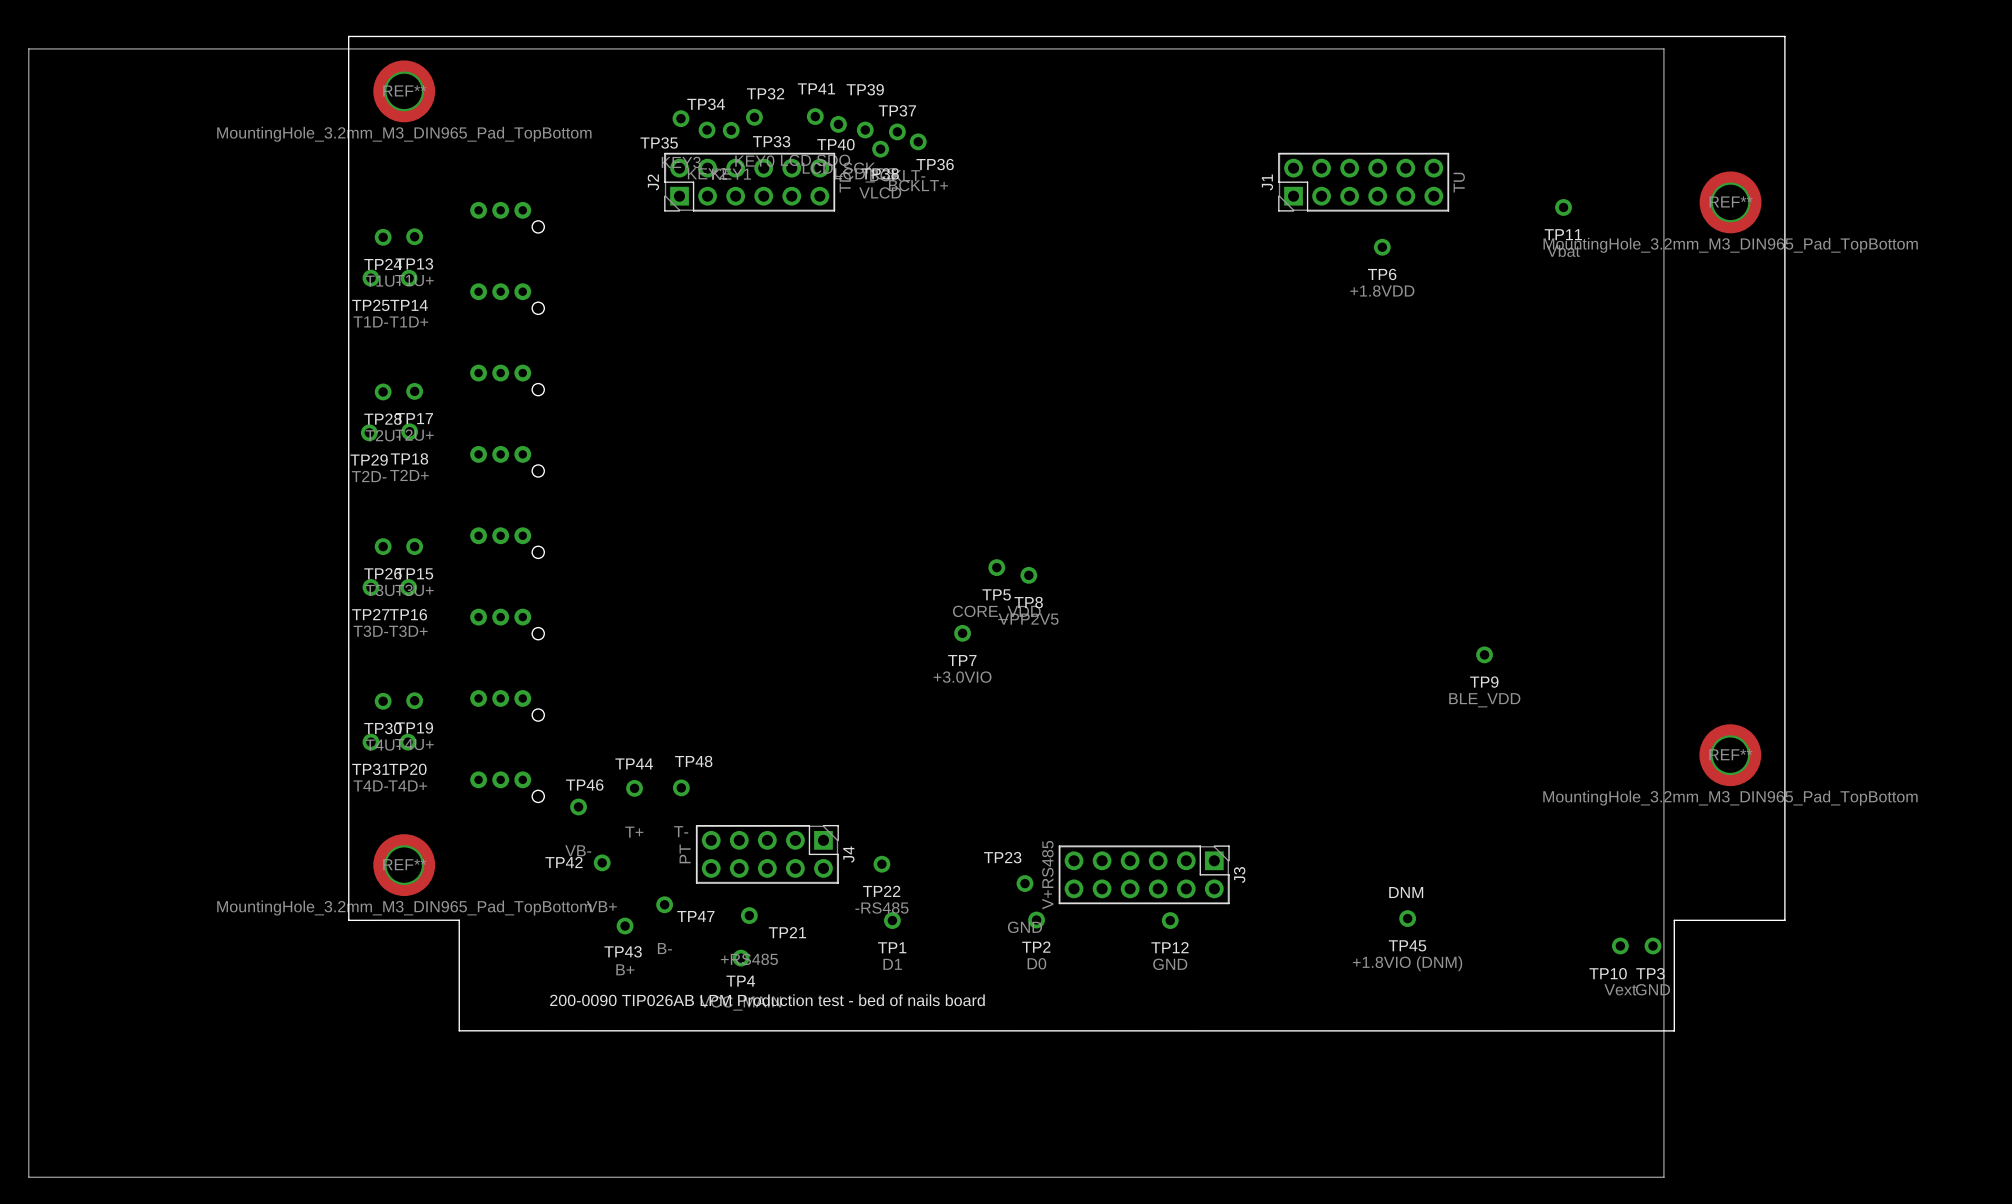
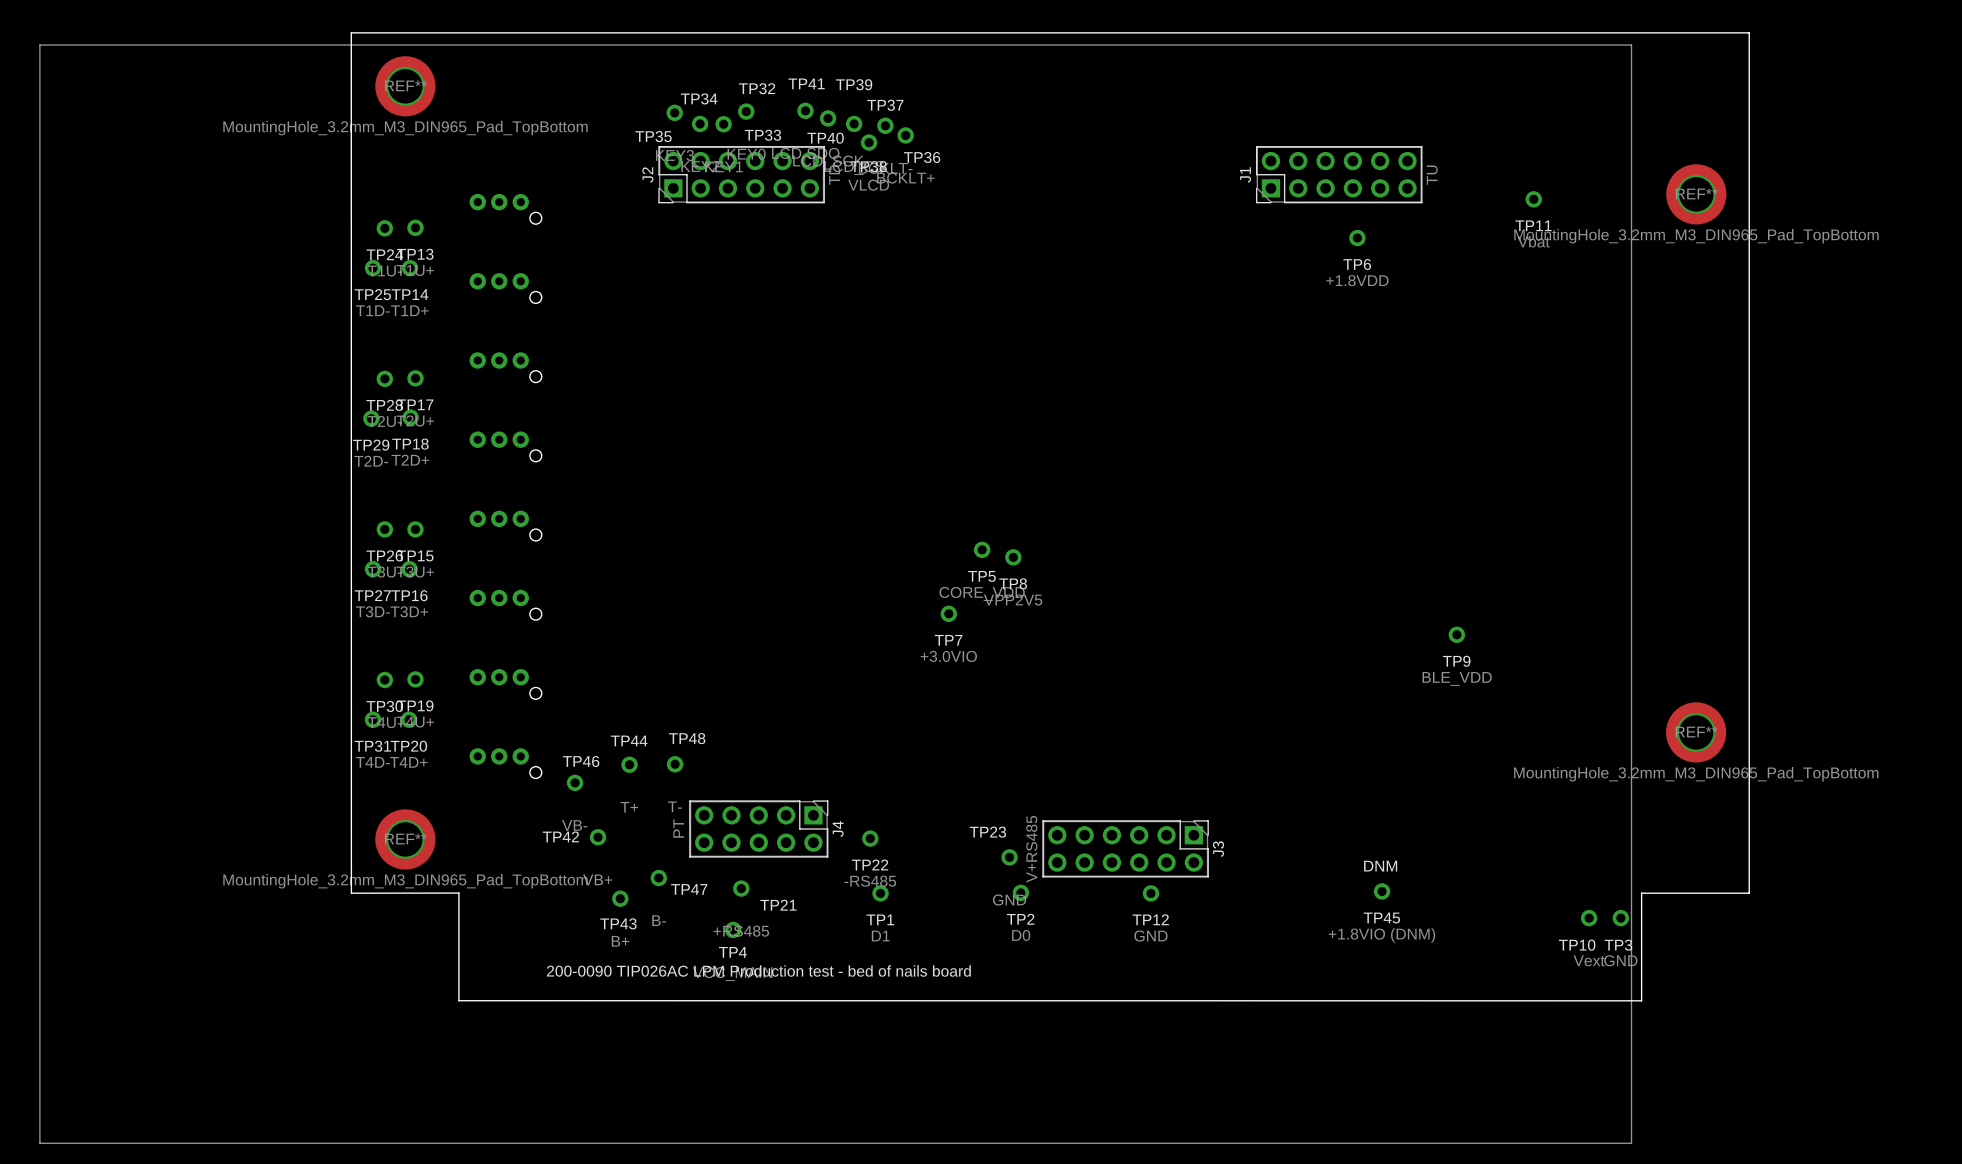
text: 200-0090 TIP026AB LPM Production test - bed of nails board (767, 1000) -> 200-0090 TIP026AC LPM Production test - bed of nails board (758, 970)

